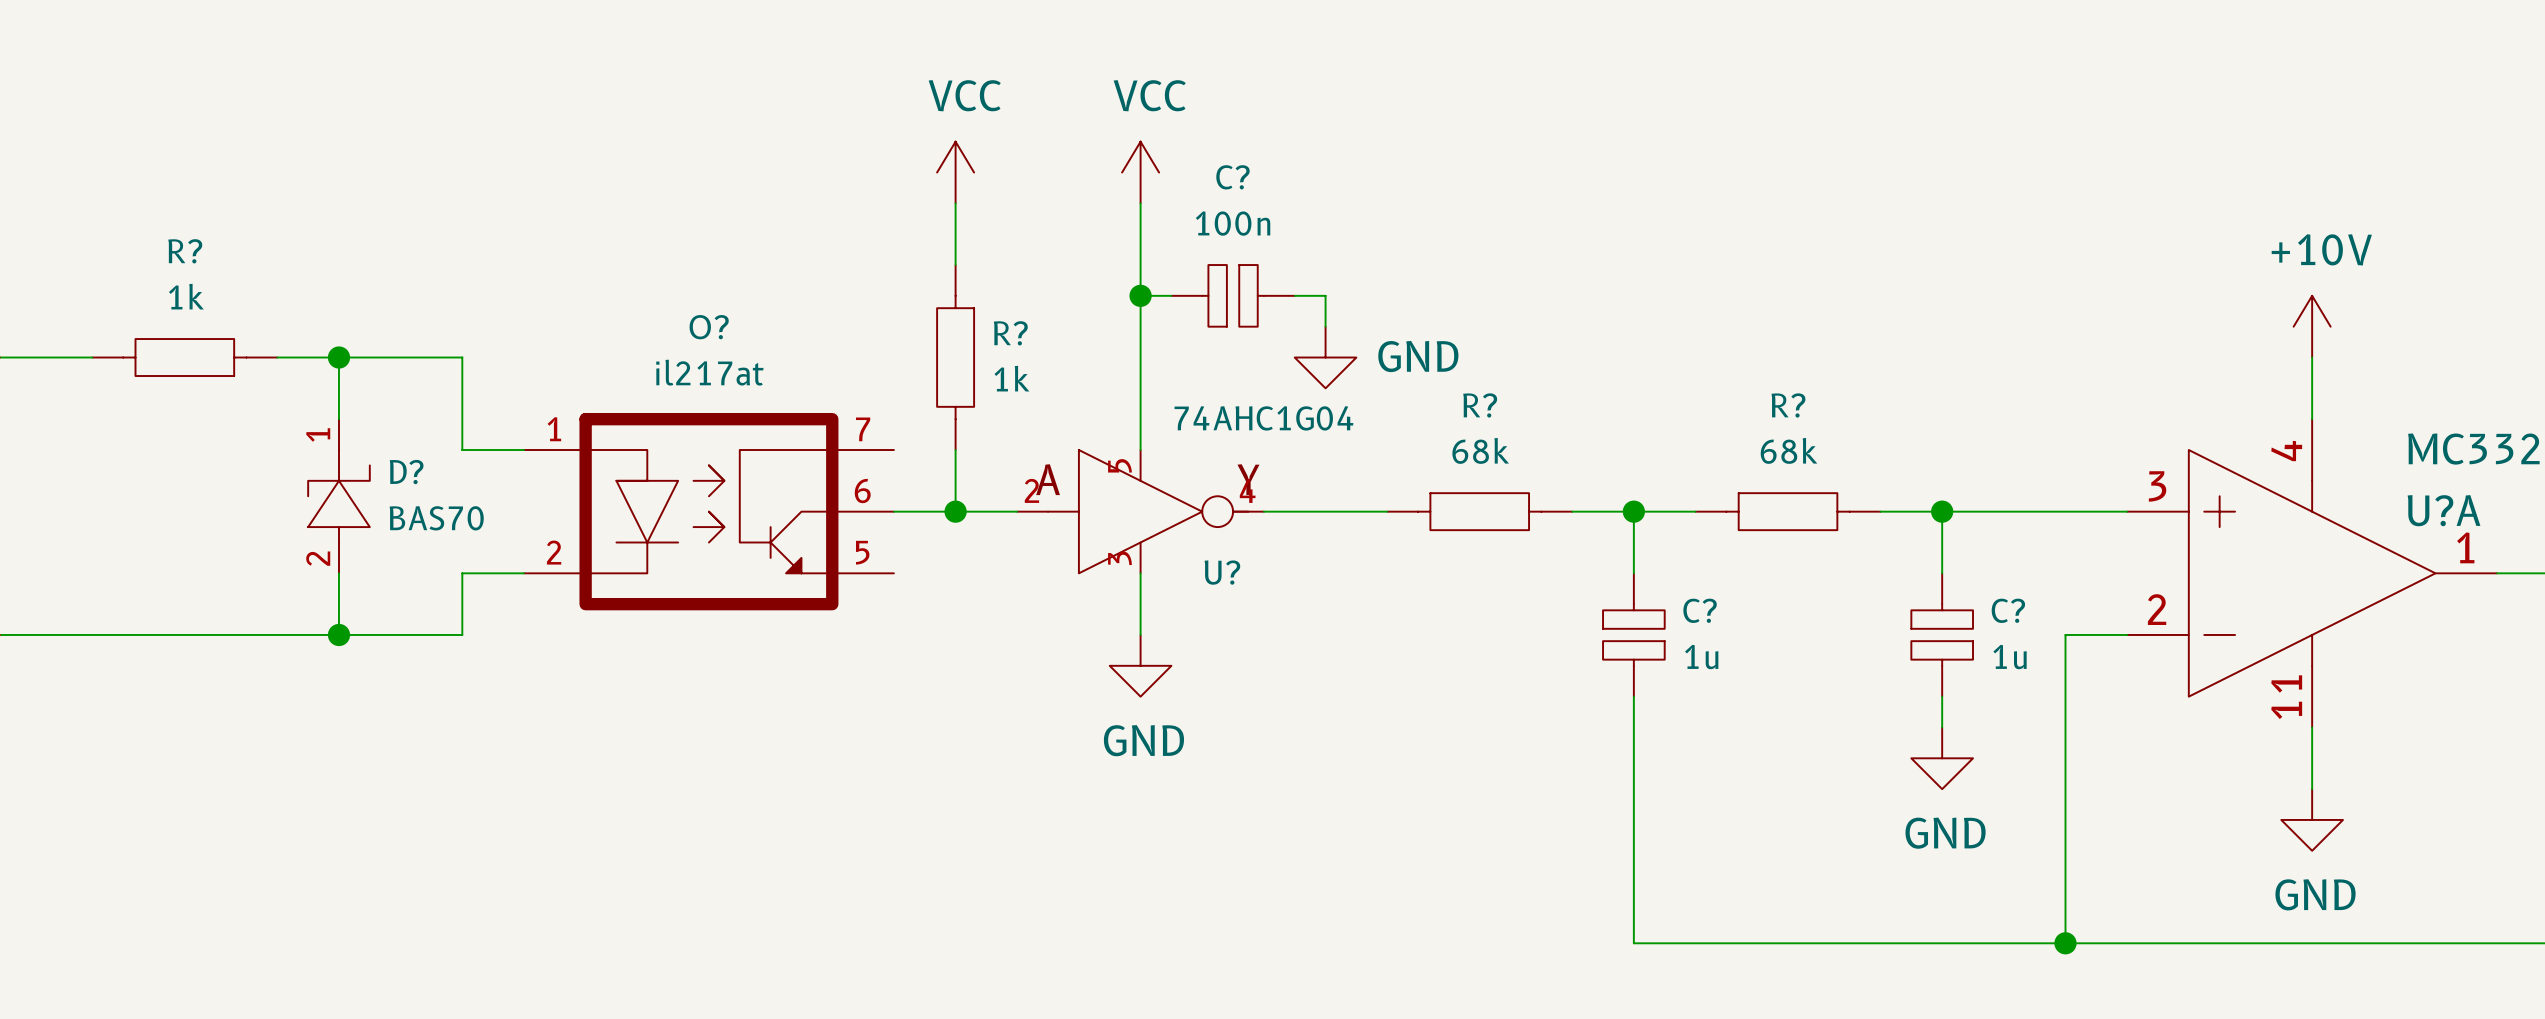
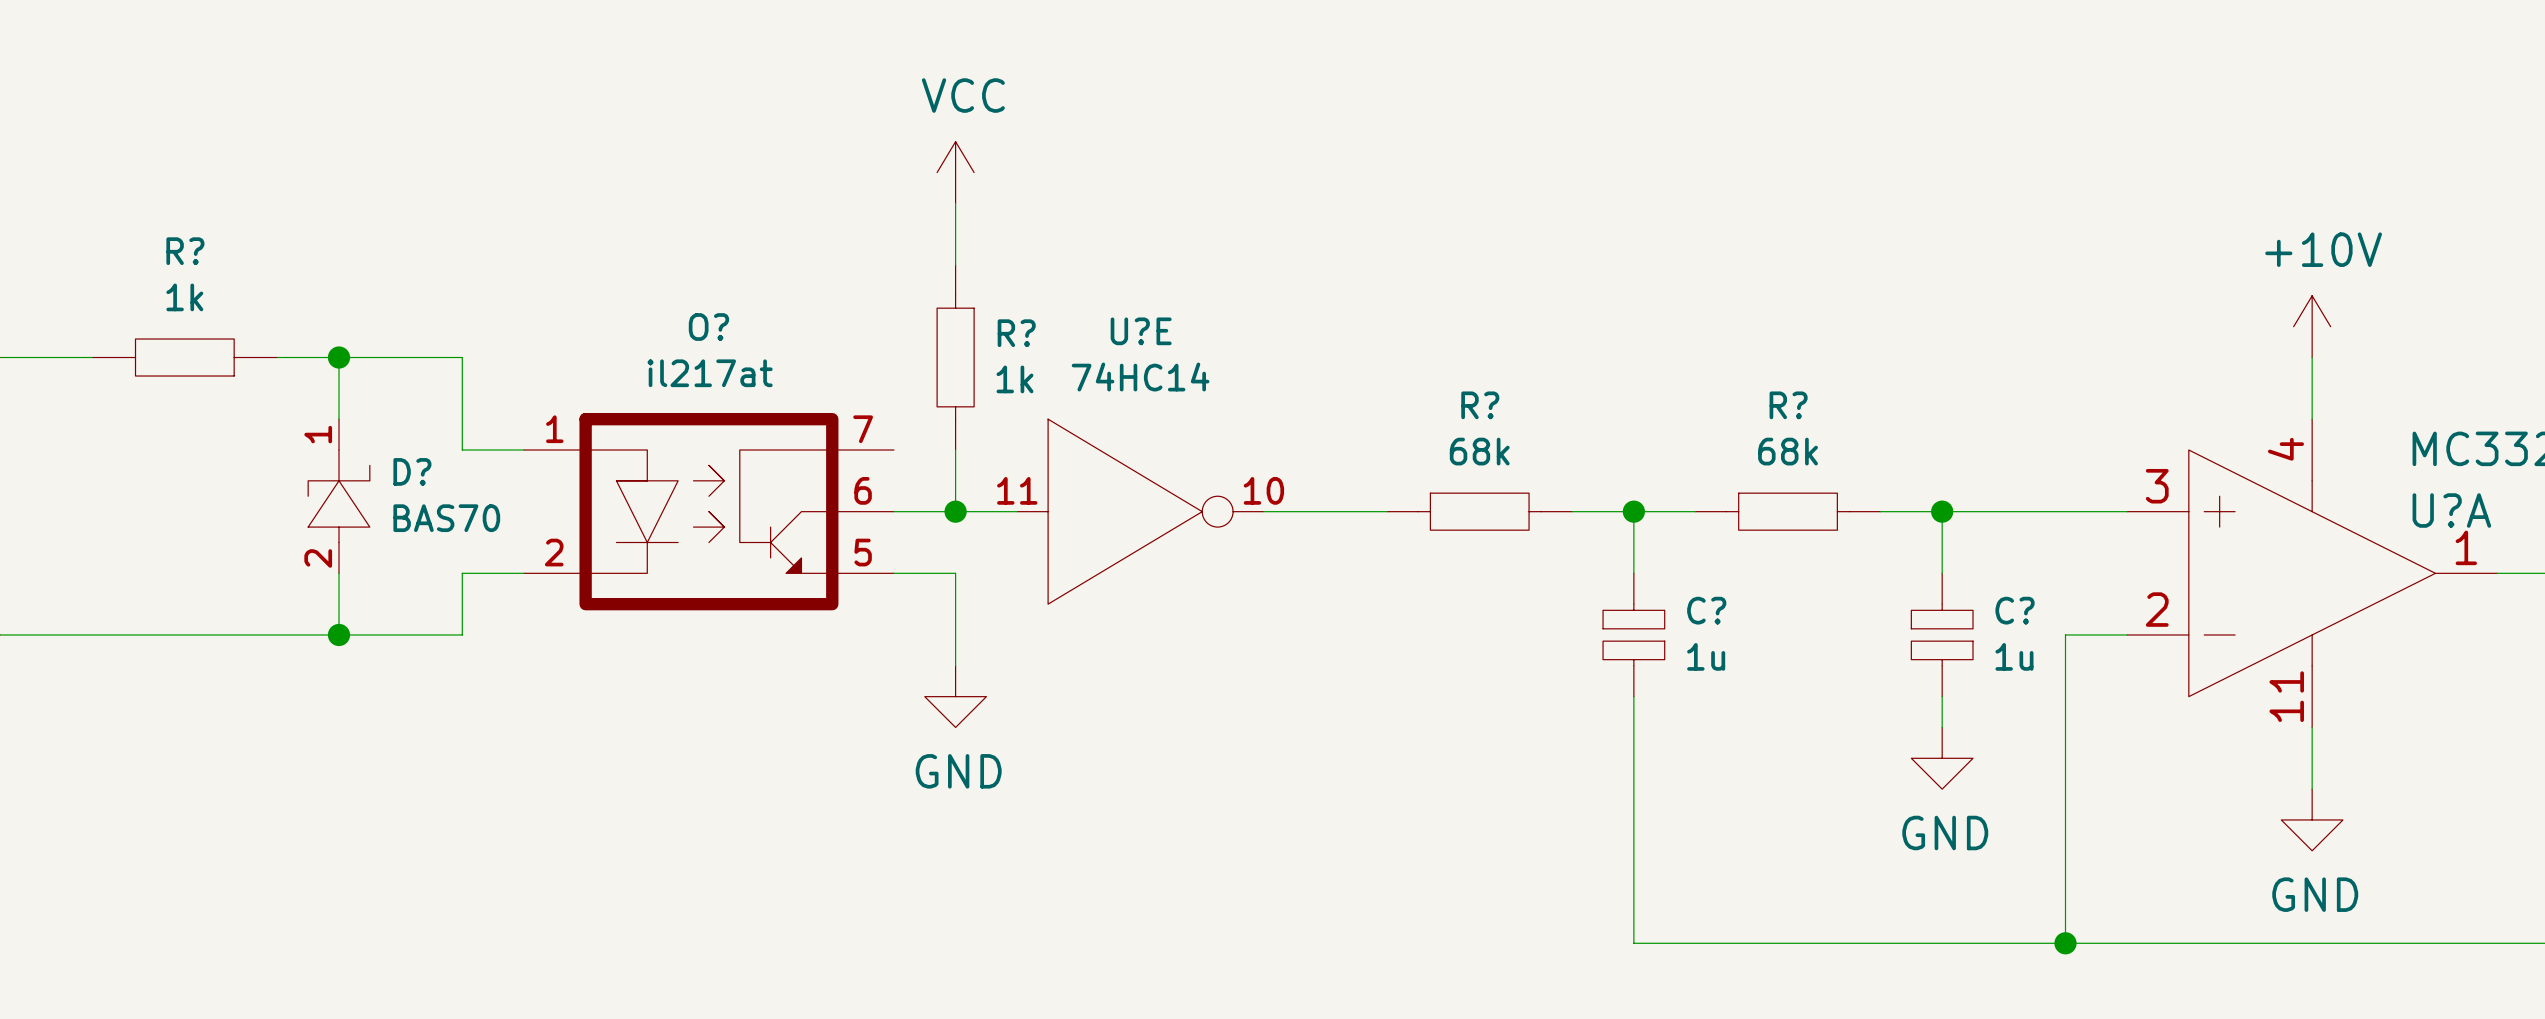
power symbol: VCC (1140, 172) -> none
wire: (1140, 203) (1140, 450) -> none
wire: (1140, 295) (1171, 295) -> none
junction: (1140, 295) -> none
C?: 100n (1233, 295) -> none
wire: (1294, 295) (1325, 295) (1325, 326) -> none
power symbol: GND (1325, 357) -> none
U?: 74AHC1G04 (1140, 511) -> none
U?E: none -> 74HC14 (1140, 511)
wire: none -> (893, 573) (955, 573) (955, 665)
wire: (1140, 573) (1140, 634) -> none
power symbol position: GND (1140, 665) -> GND (955, 696)

